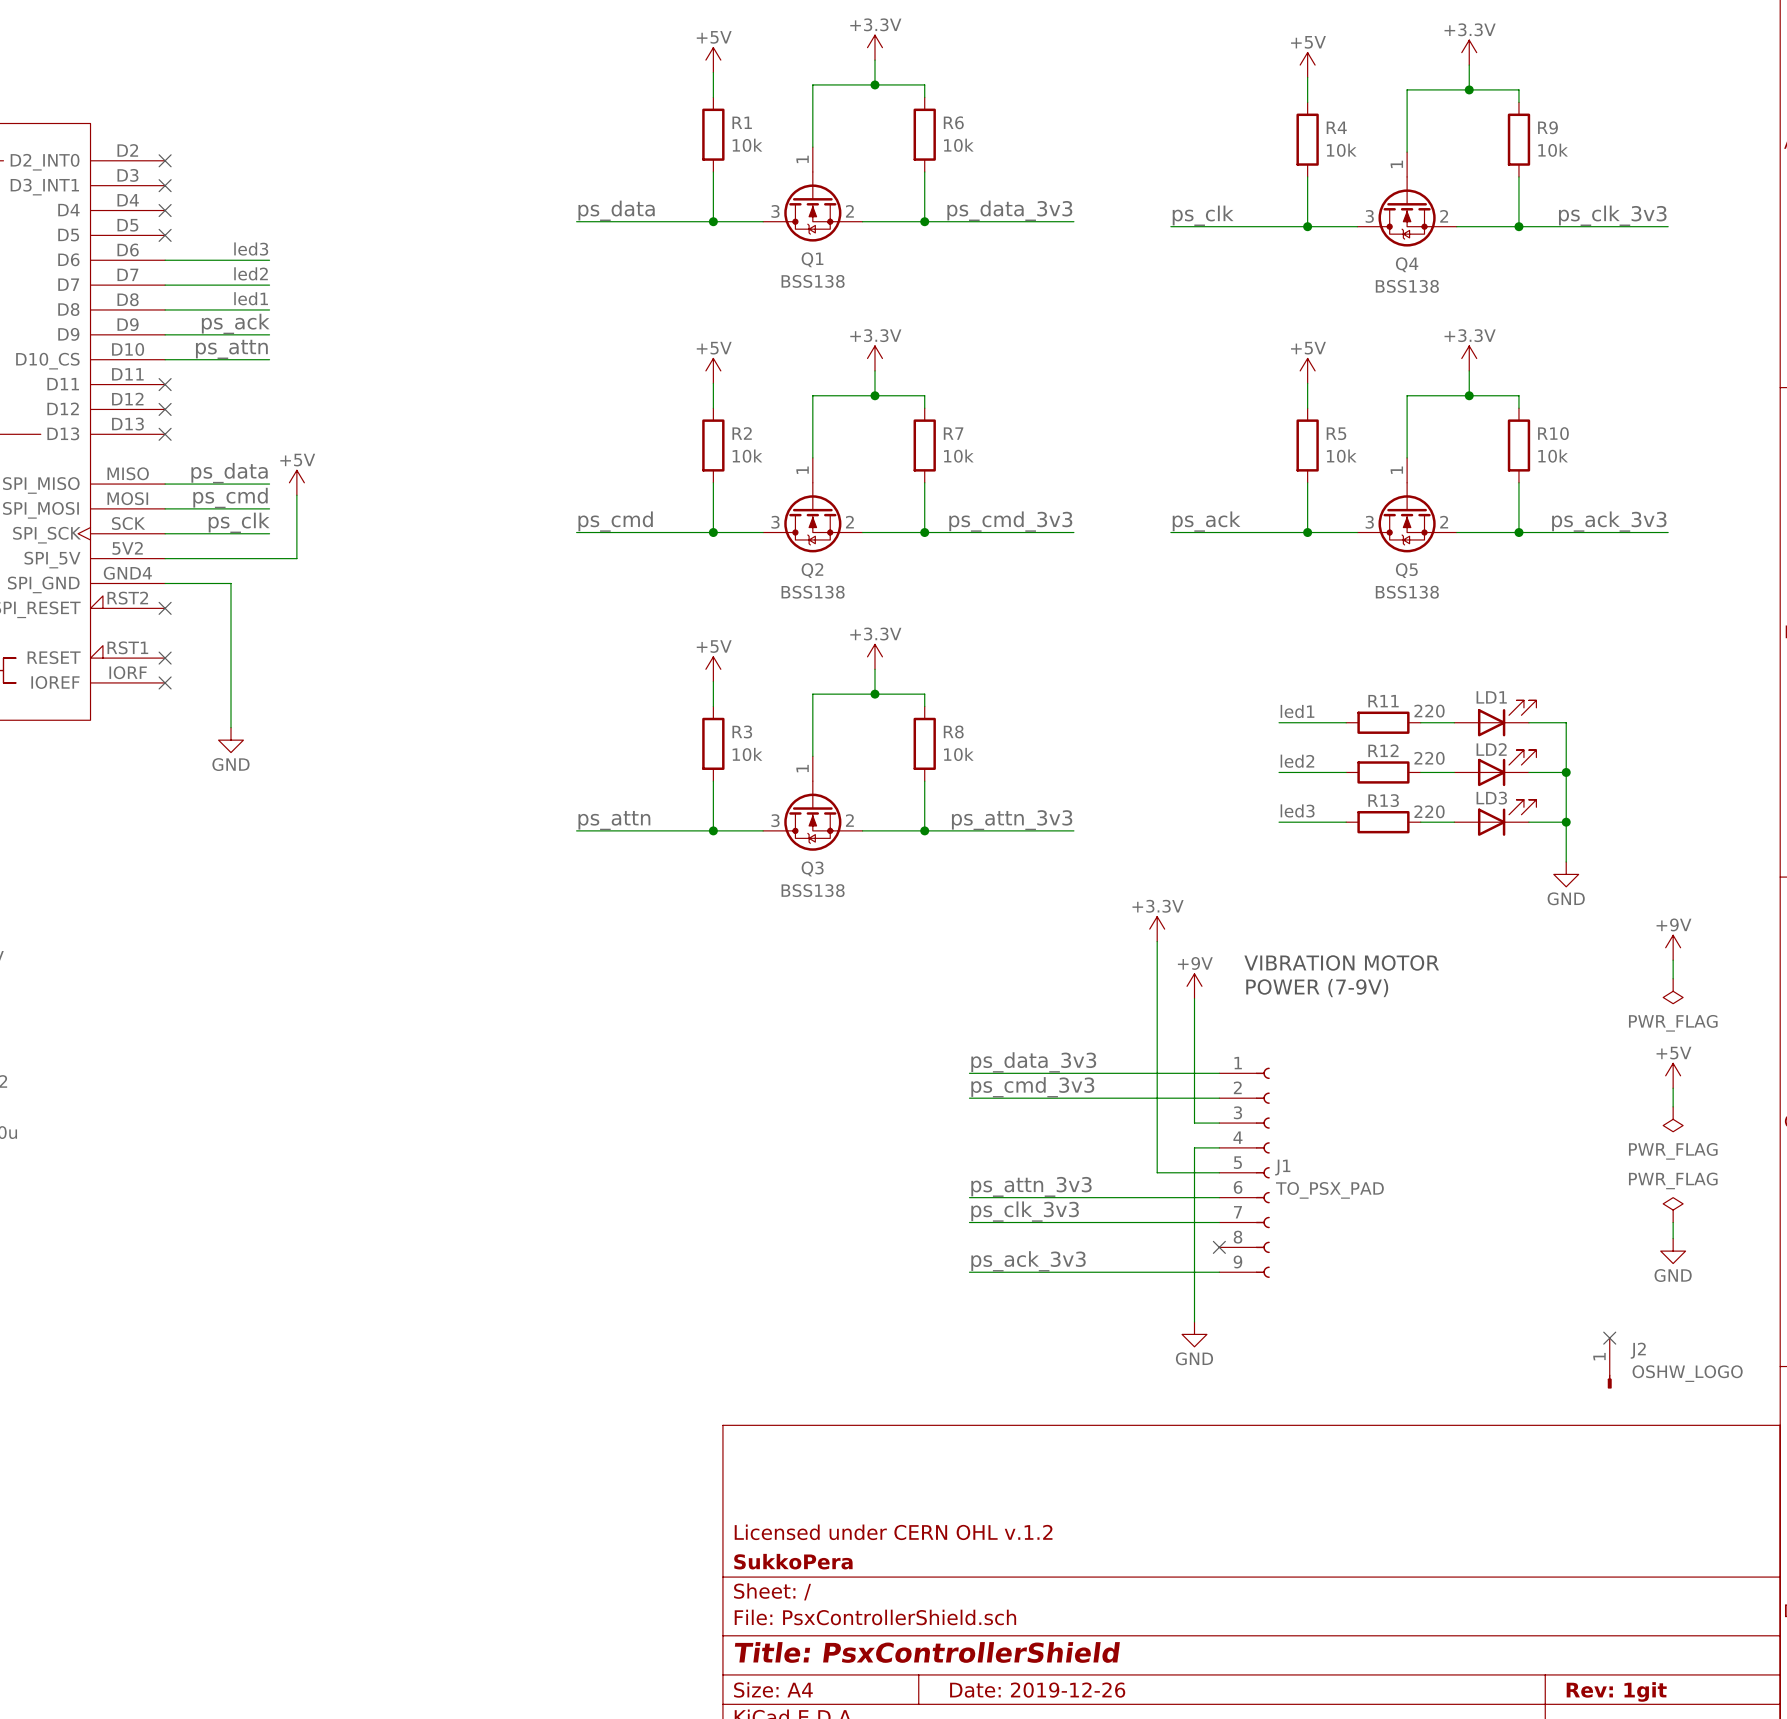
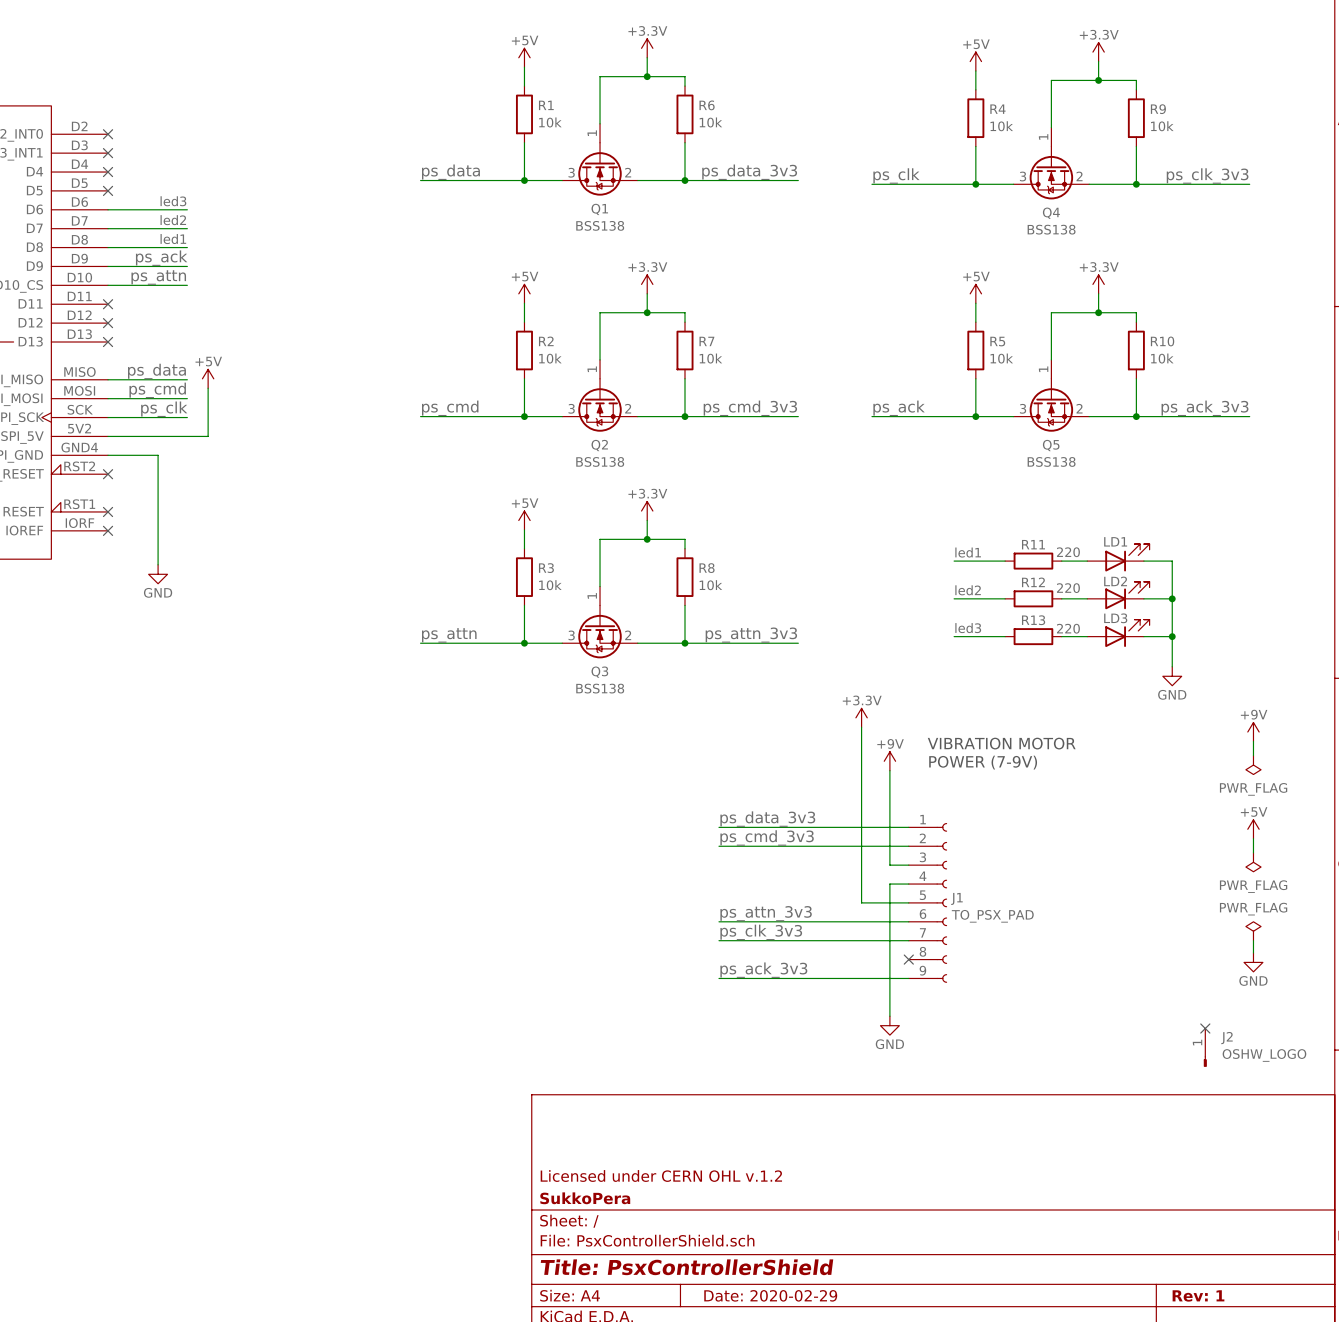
title block: Date: 2019-12-26 (1037, 1690) -> Date: 2020-02-29 (770, 1295)
title block: Rev: 1git (1616, 1691) -> Rev: 1 (1198, 1295)

